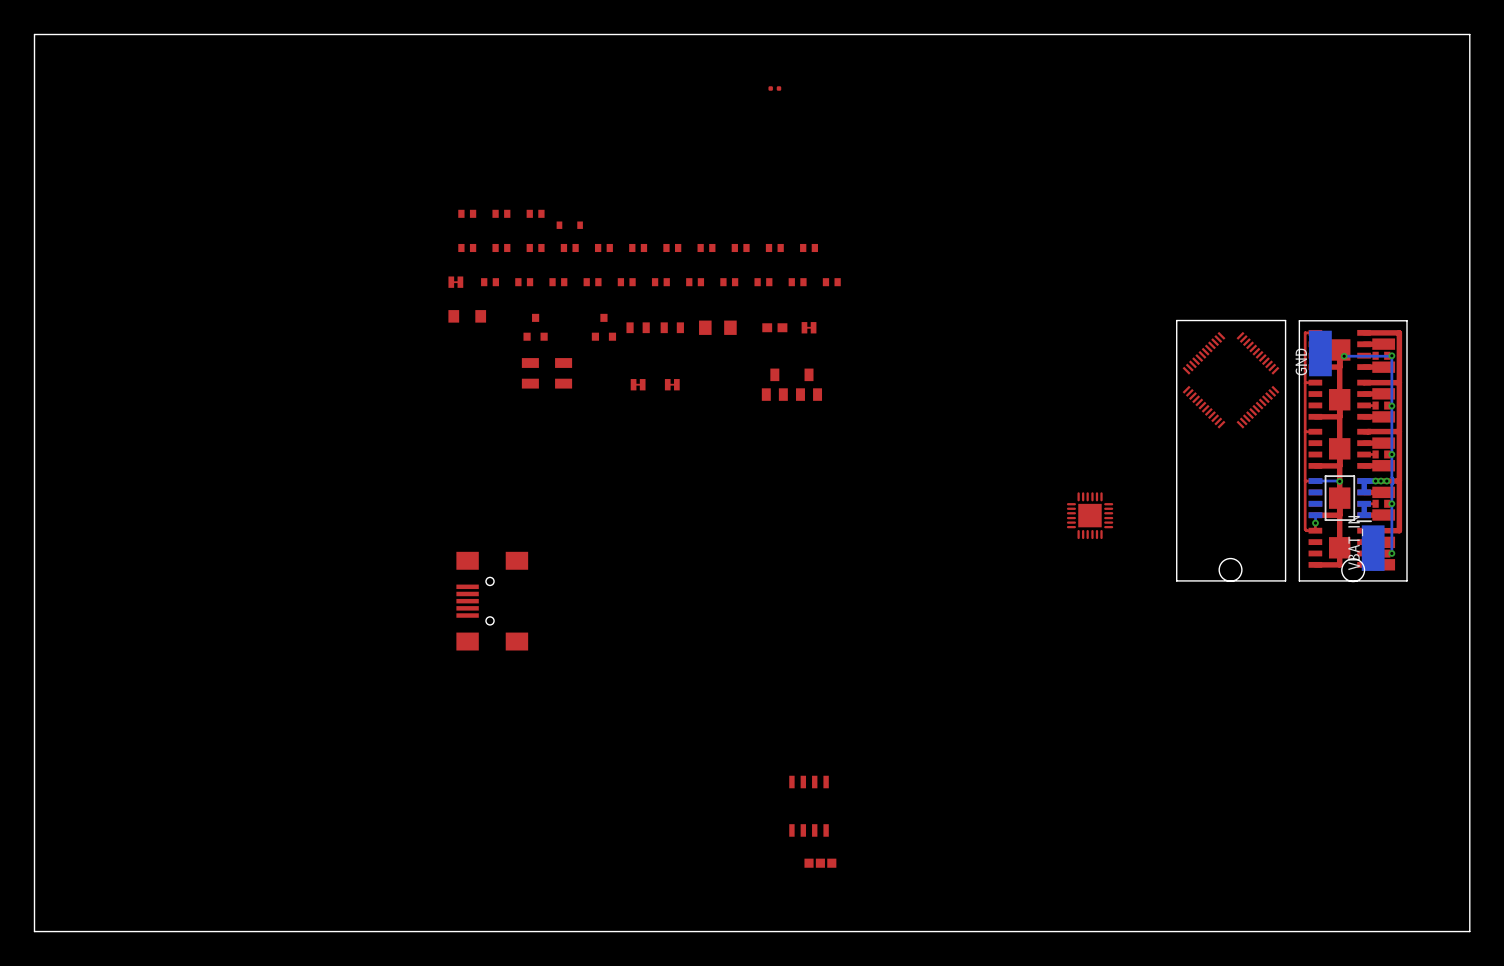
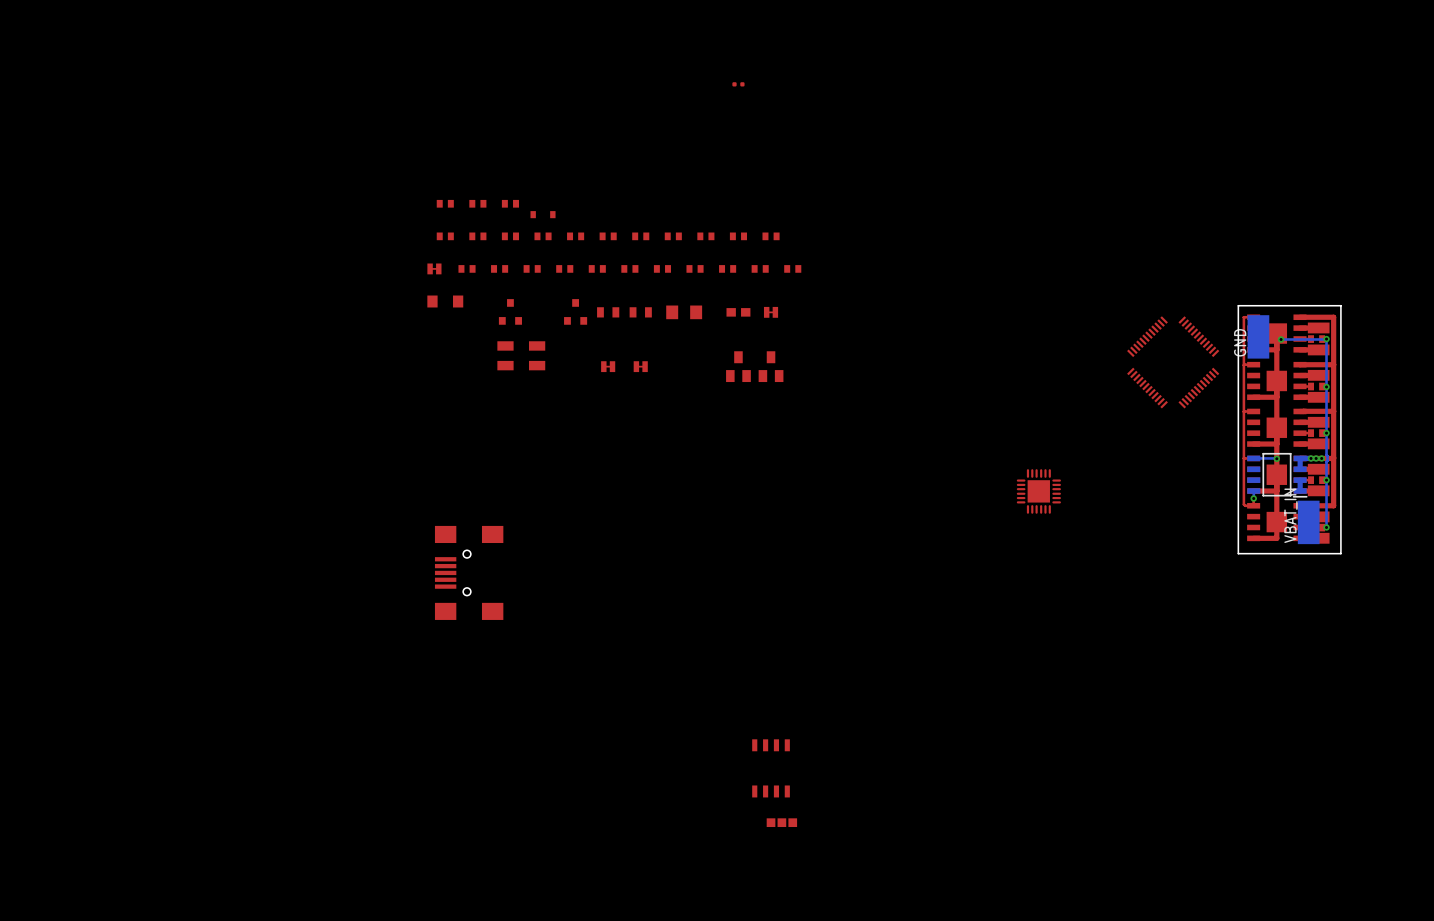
board edge: (1469, 34) (34, 34) (34, 931) (1469, 931) (1469, 34) -> none
board edge: (1285, 320) (1176, 320) (1176, 580) (1285, 580) (1285, 320) -> none
round board edge: [1219, 558, 1242, 582] -> none
round board edge: [1341, 558, 1365, 582] -> none

